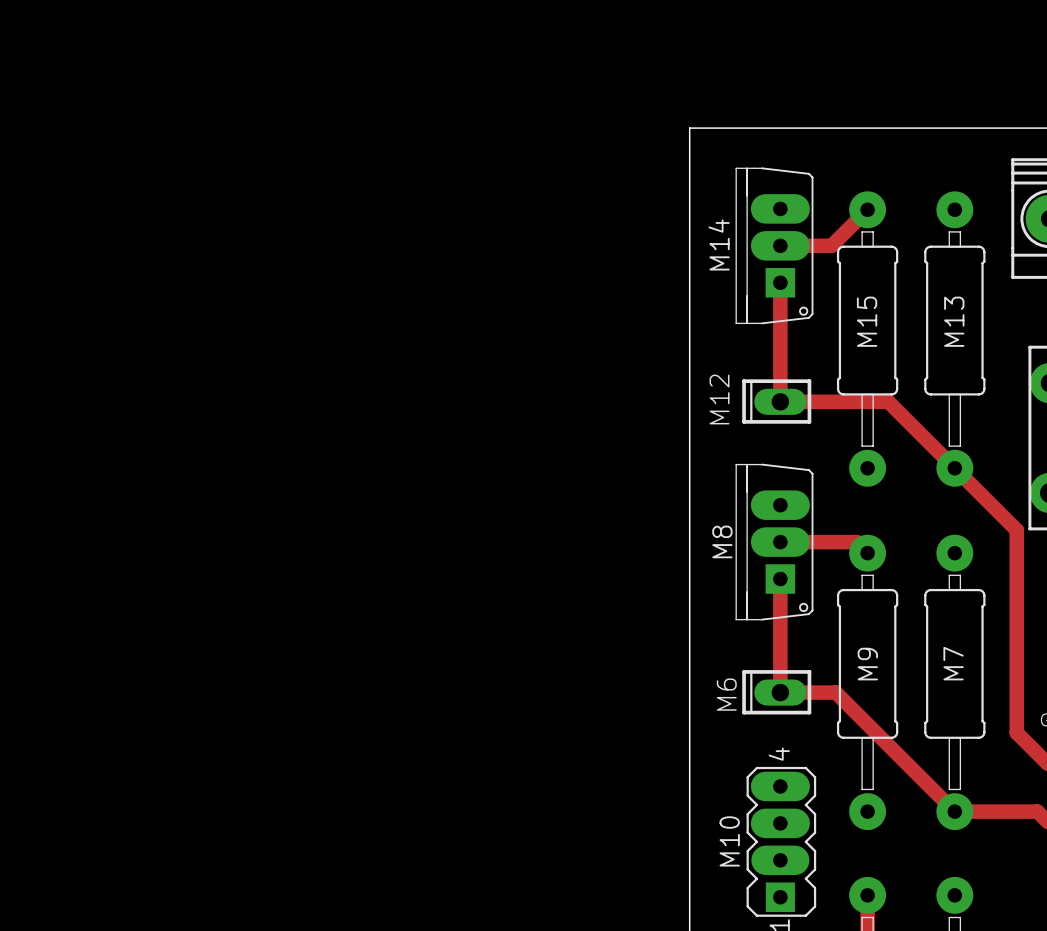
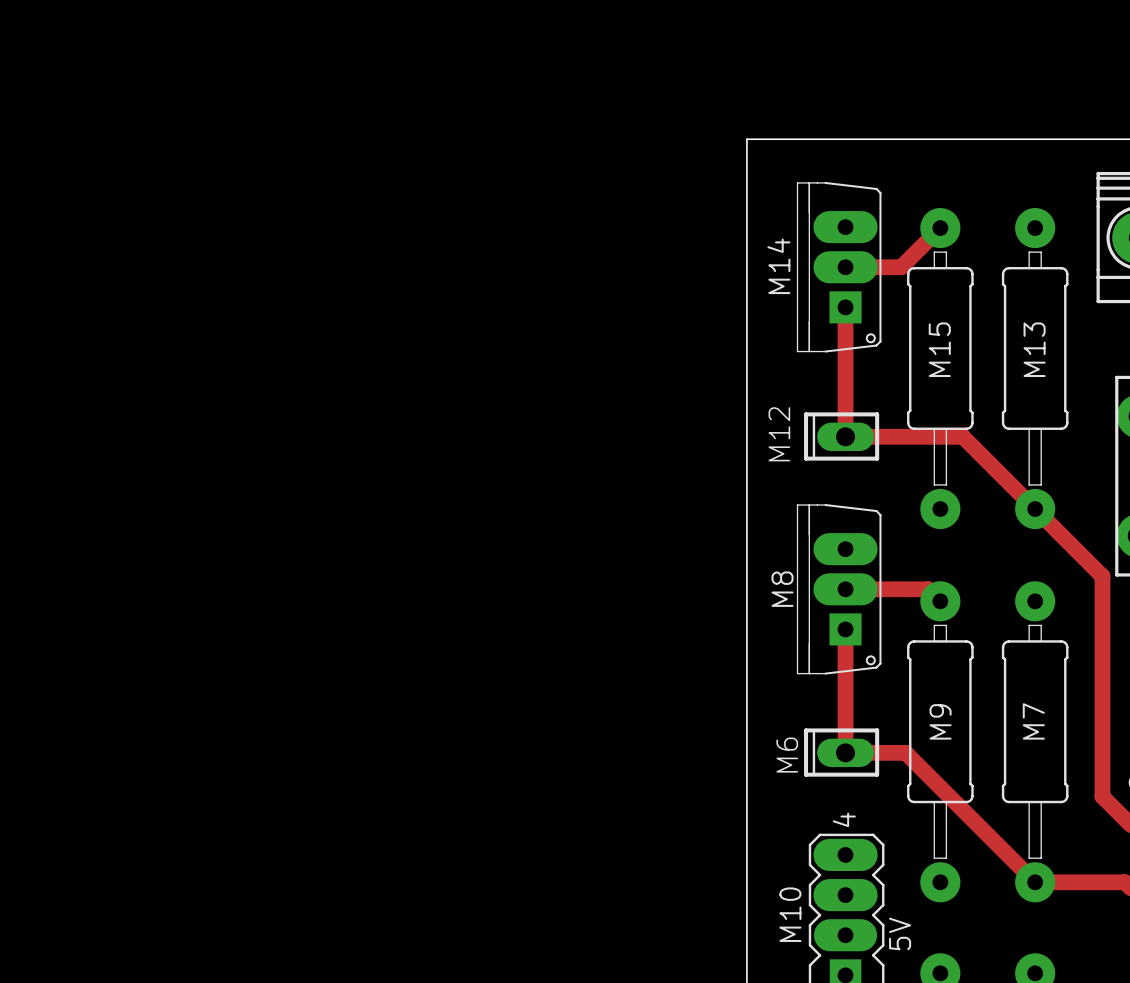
M10 text: none -> 5V (900, 933)

